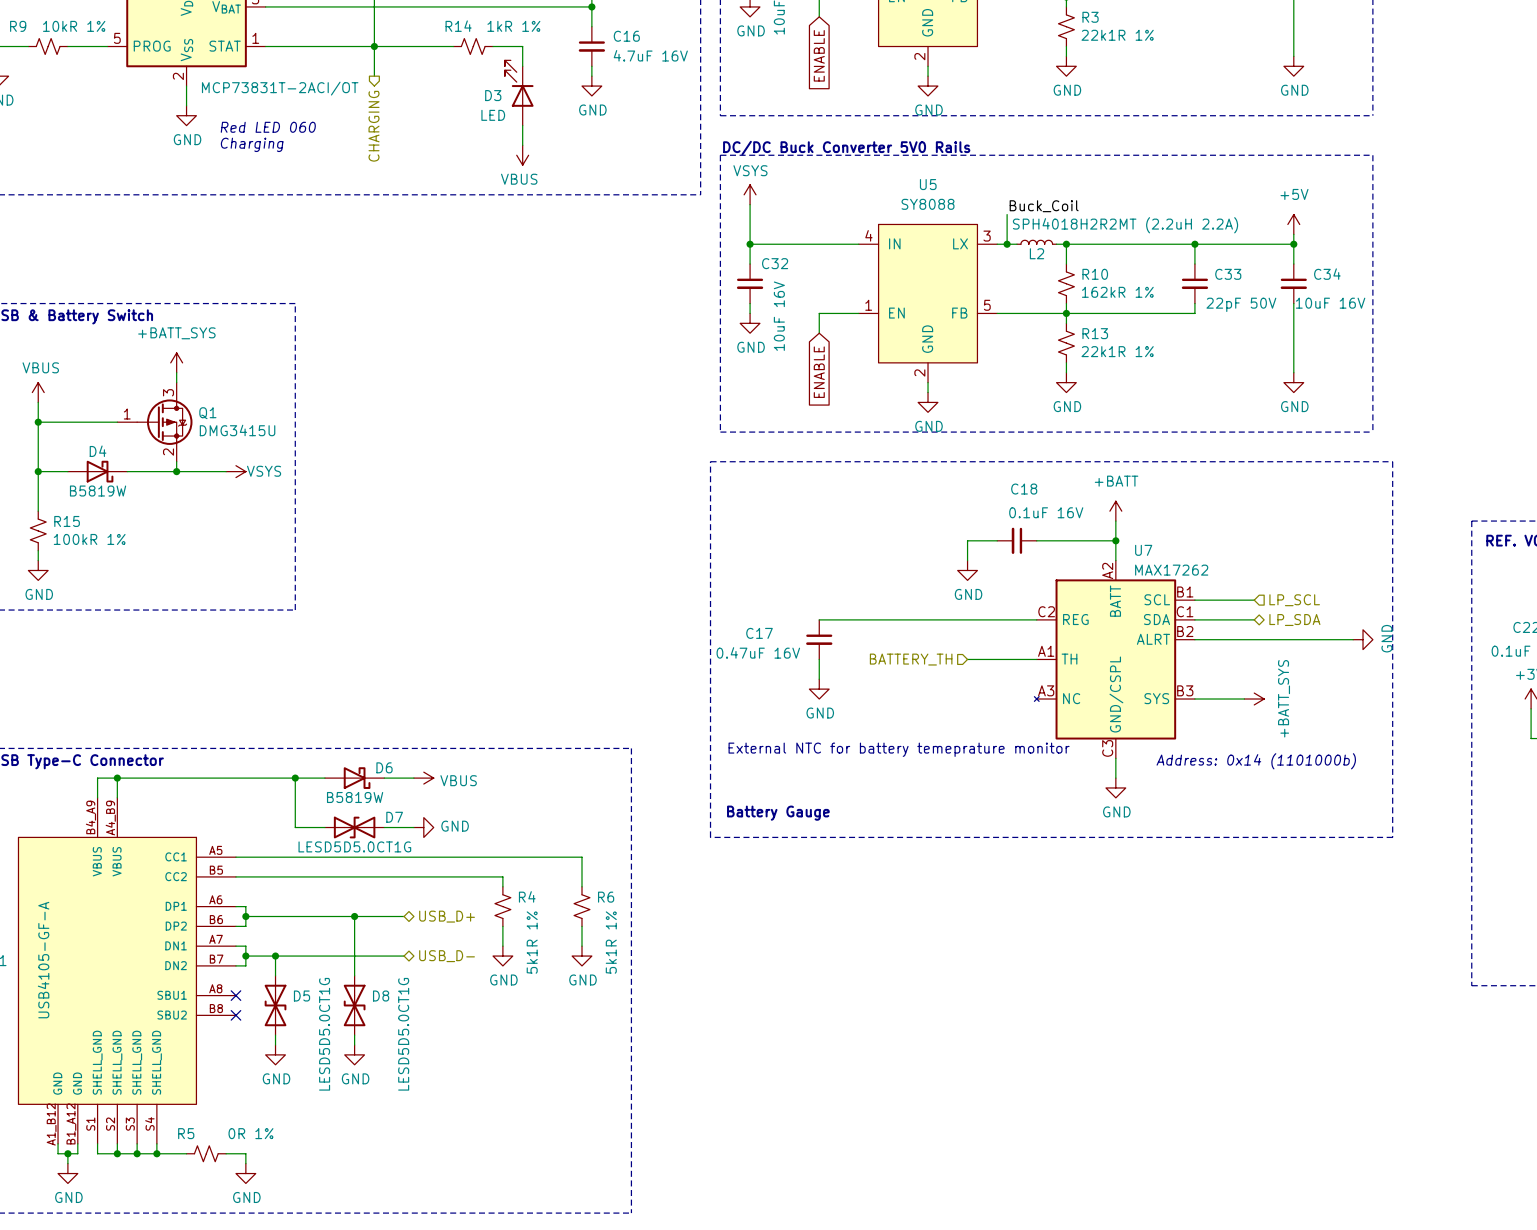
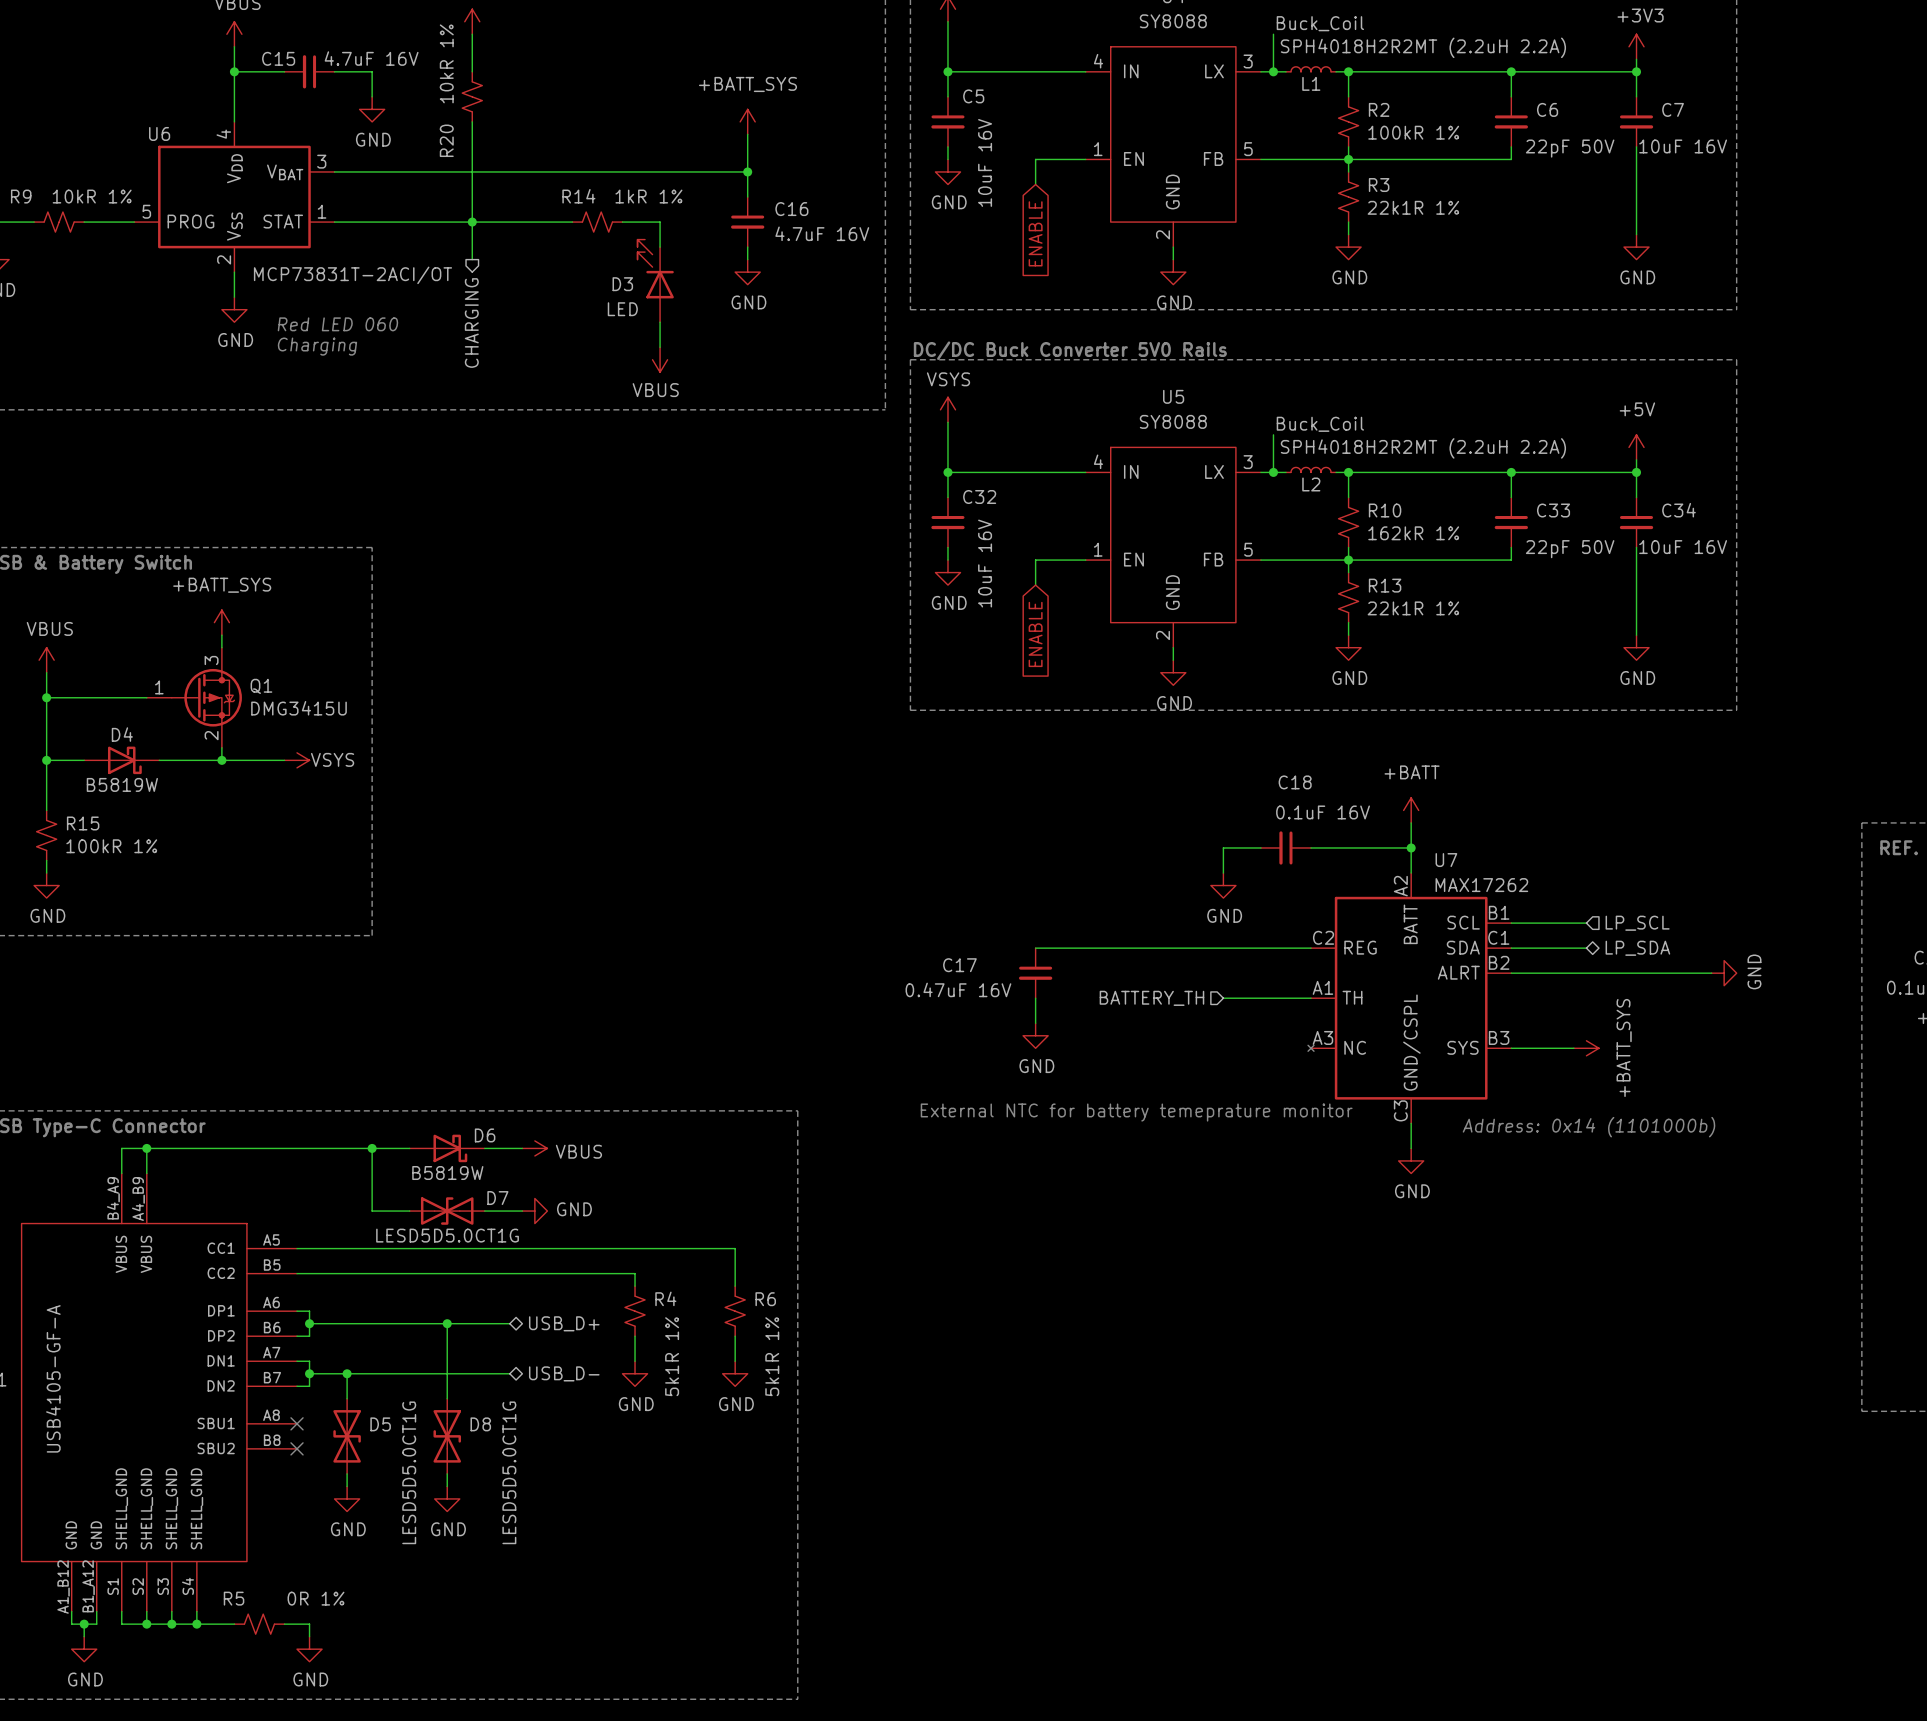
line: (710, 461) (1392, 461) (1392, 837) (710, 837) (710, 461) -> none
text: Battery Gauge (778, 813) -> none

